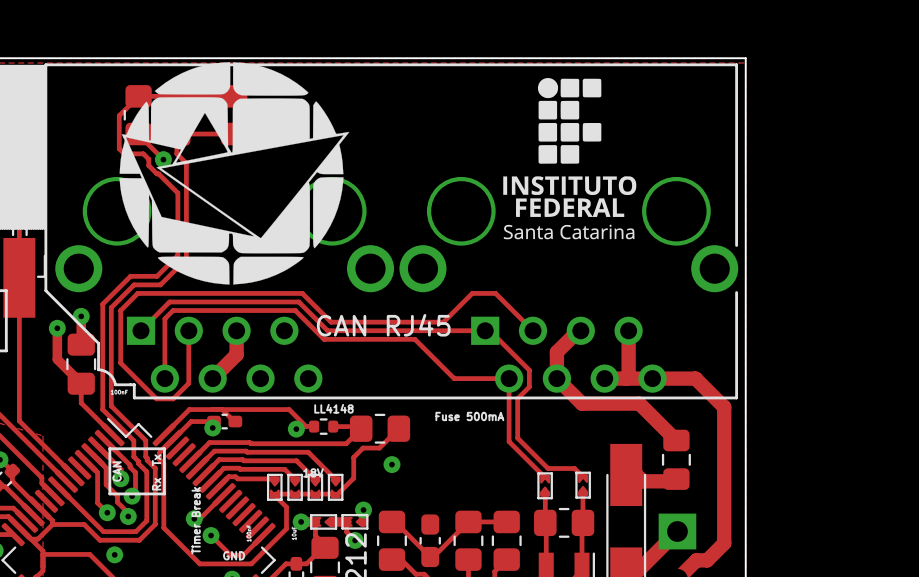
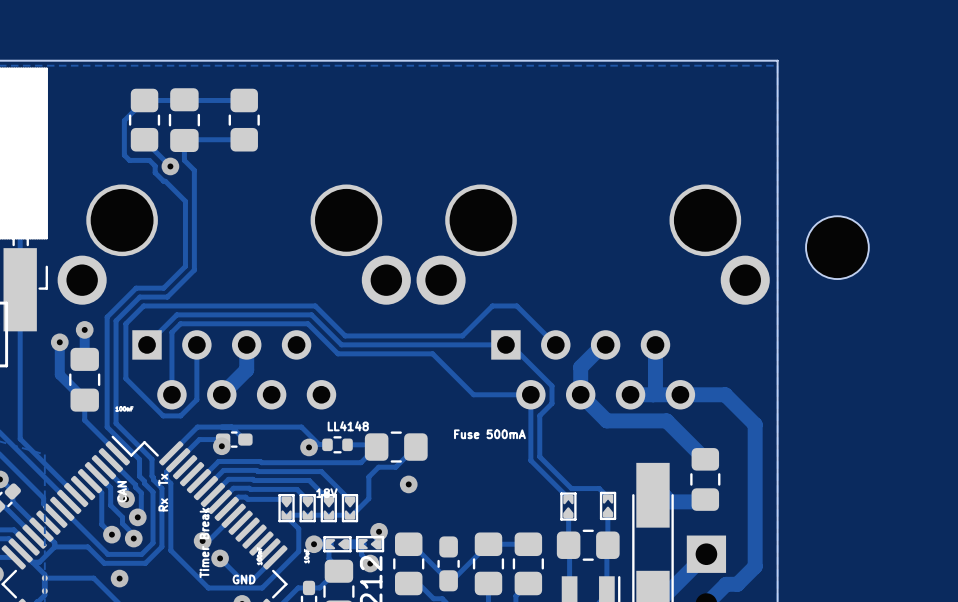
drawing: [119, 62, 350, 285] -> none
drawing: [503, 78, 637, 240] -> none
part: none -> (837, 247)
line: (736, 245) (736, 64) (45, 64) (45, 290) (98, 343) (98, 369) (109, 374) (115, 384) (134, 384) (134, 397) (736, 397) (736, 292) -> none
text: CAN RJ45 (383, 325) -> none
line: (109, 448) (164, 448) (164, 493) (109, 493) (109, 448) -> none

